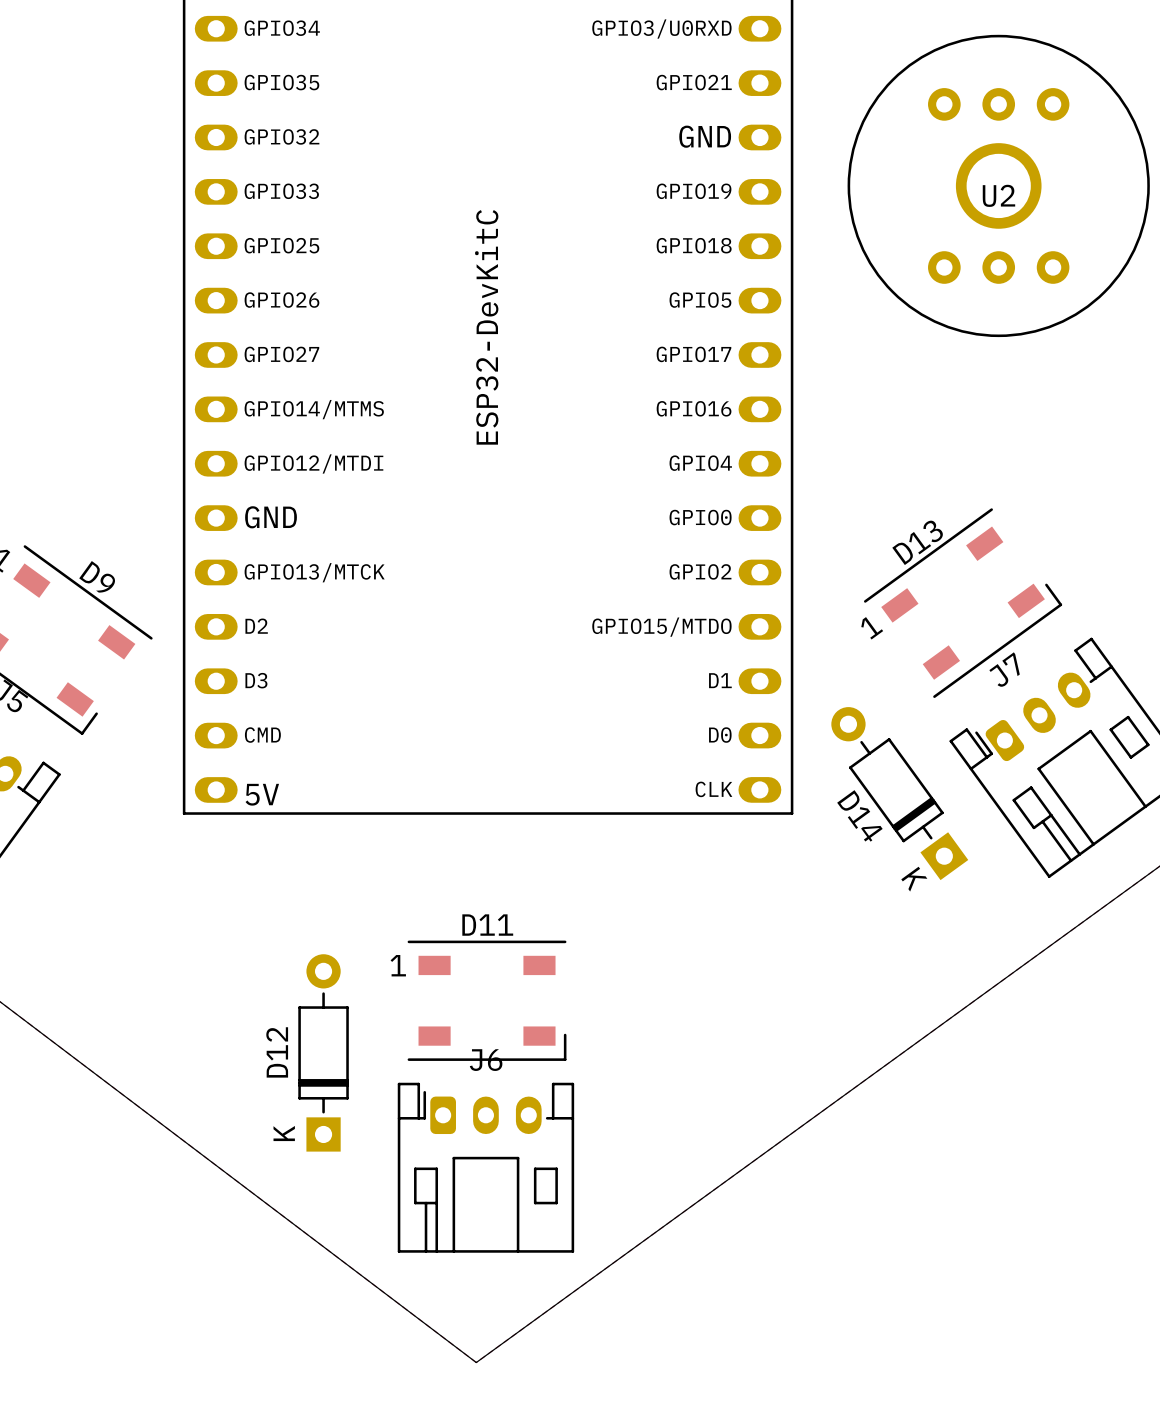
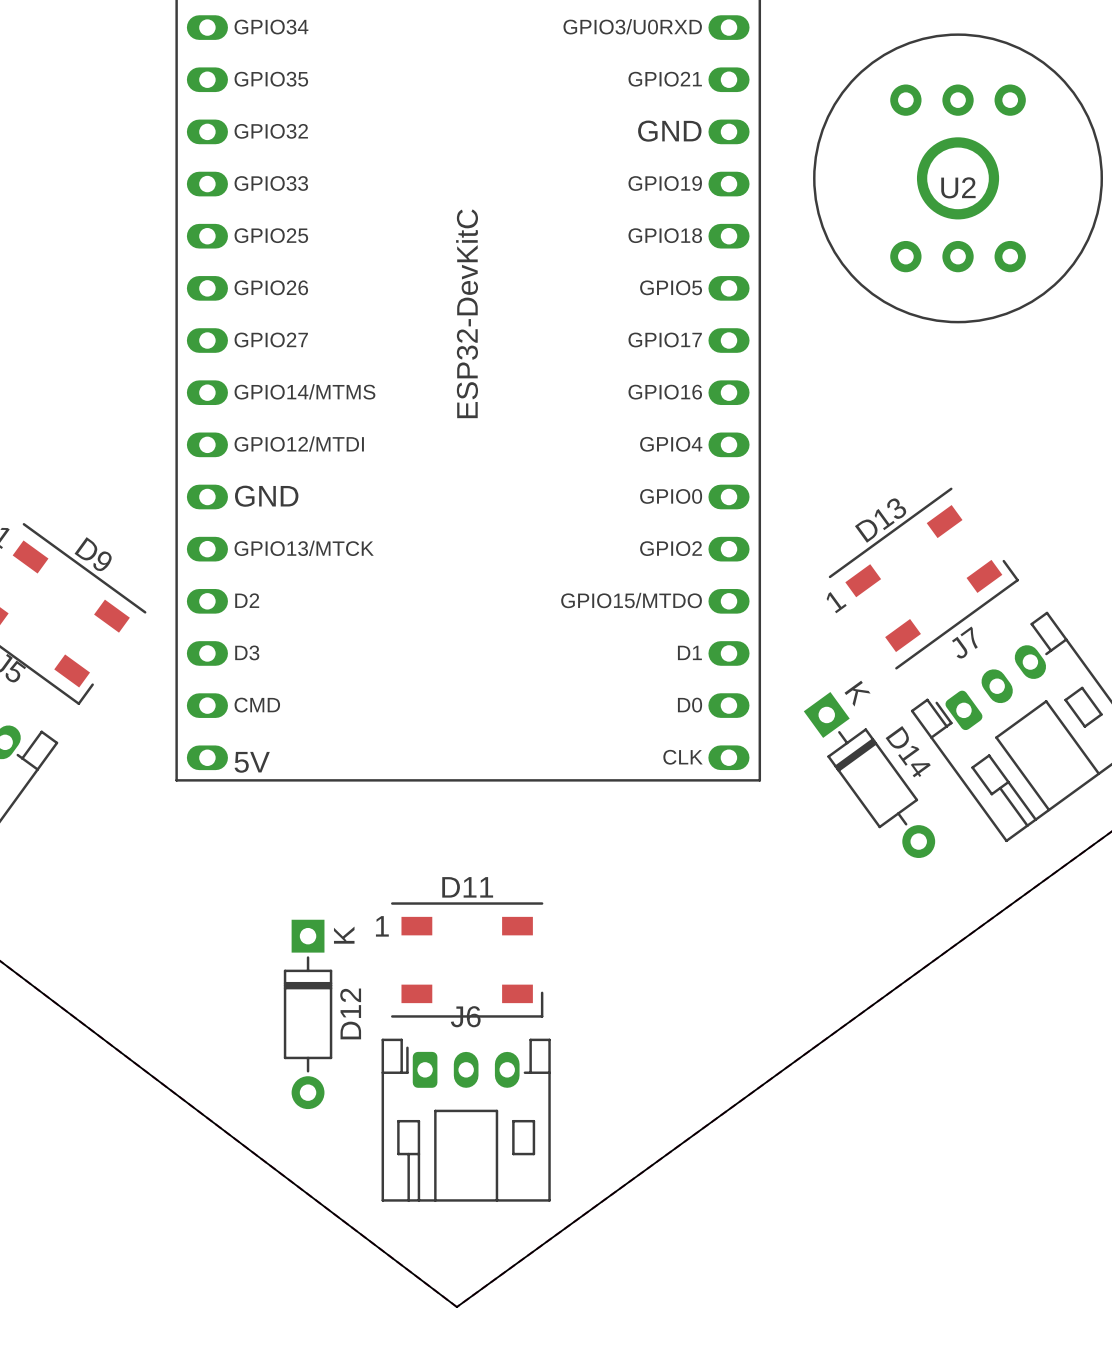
D14 rotation: 0° (899, 793) -> 180° (869, 775)
D12 rotation: 0° (323, 1052) -> 180° (308, 1014)

